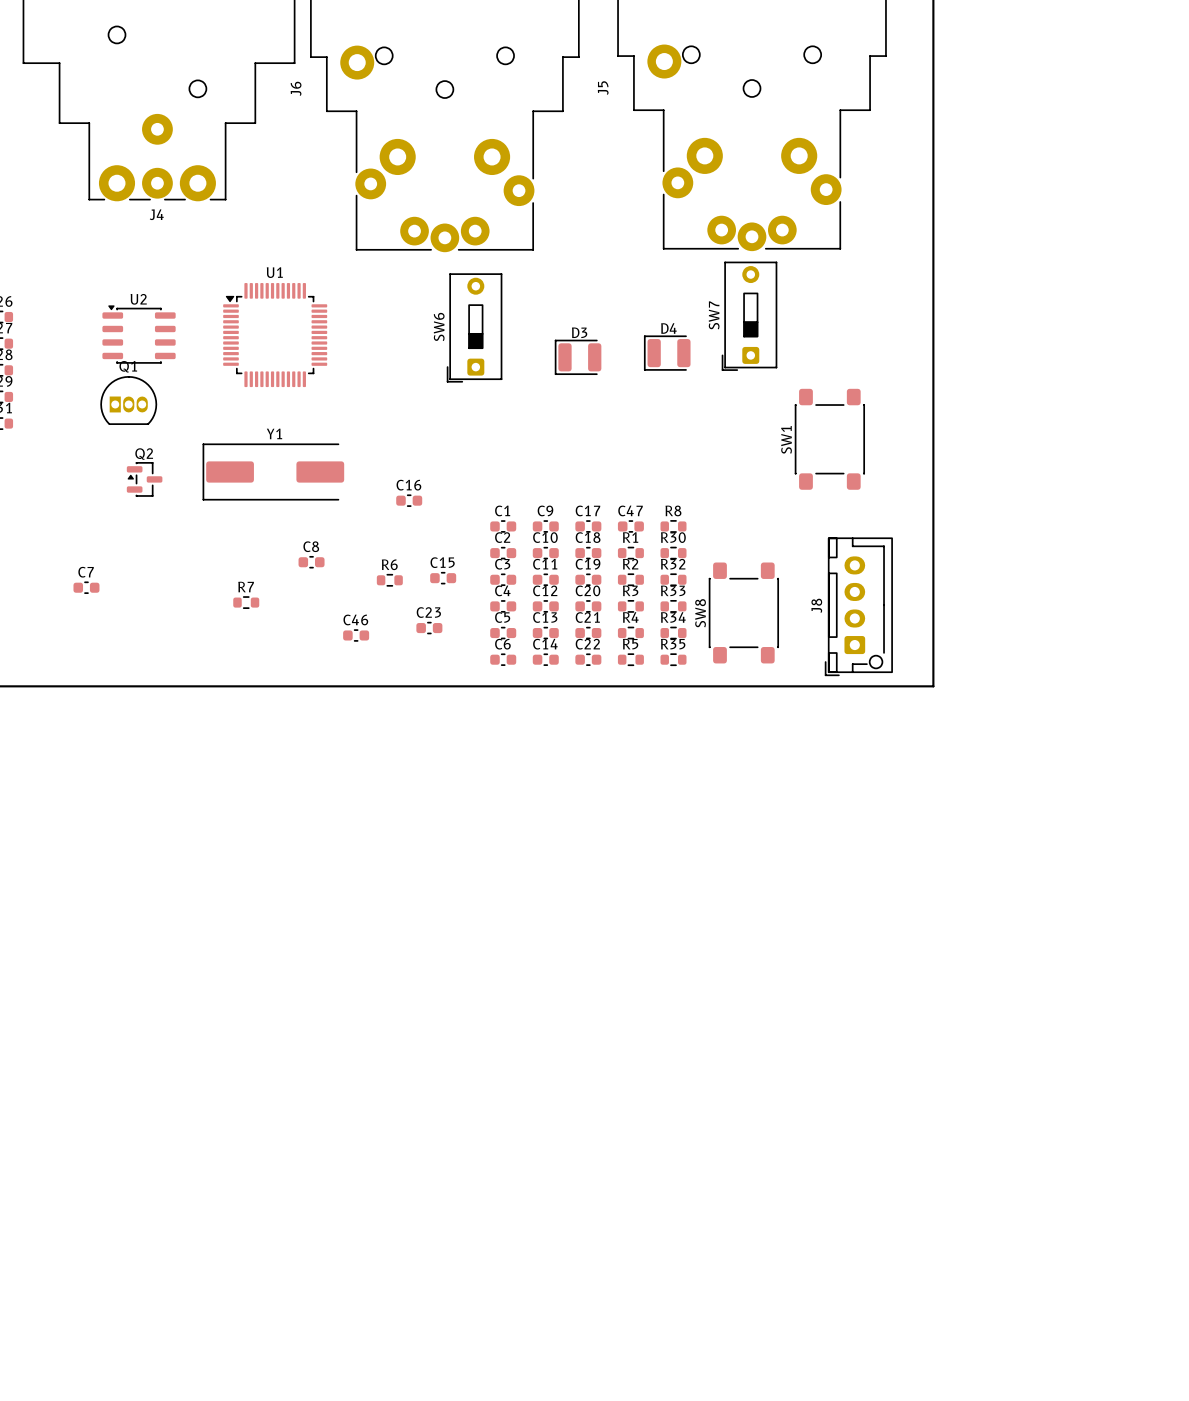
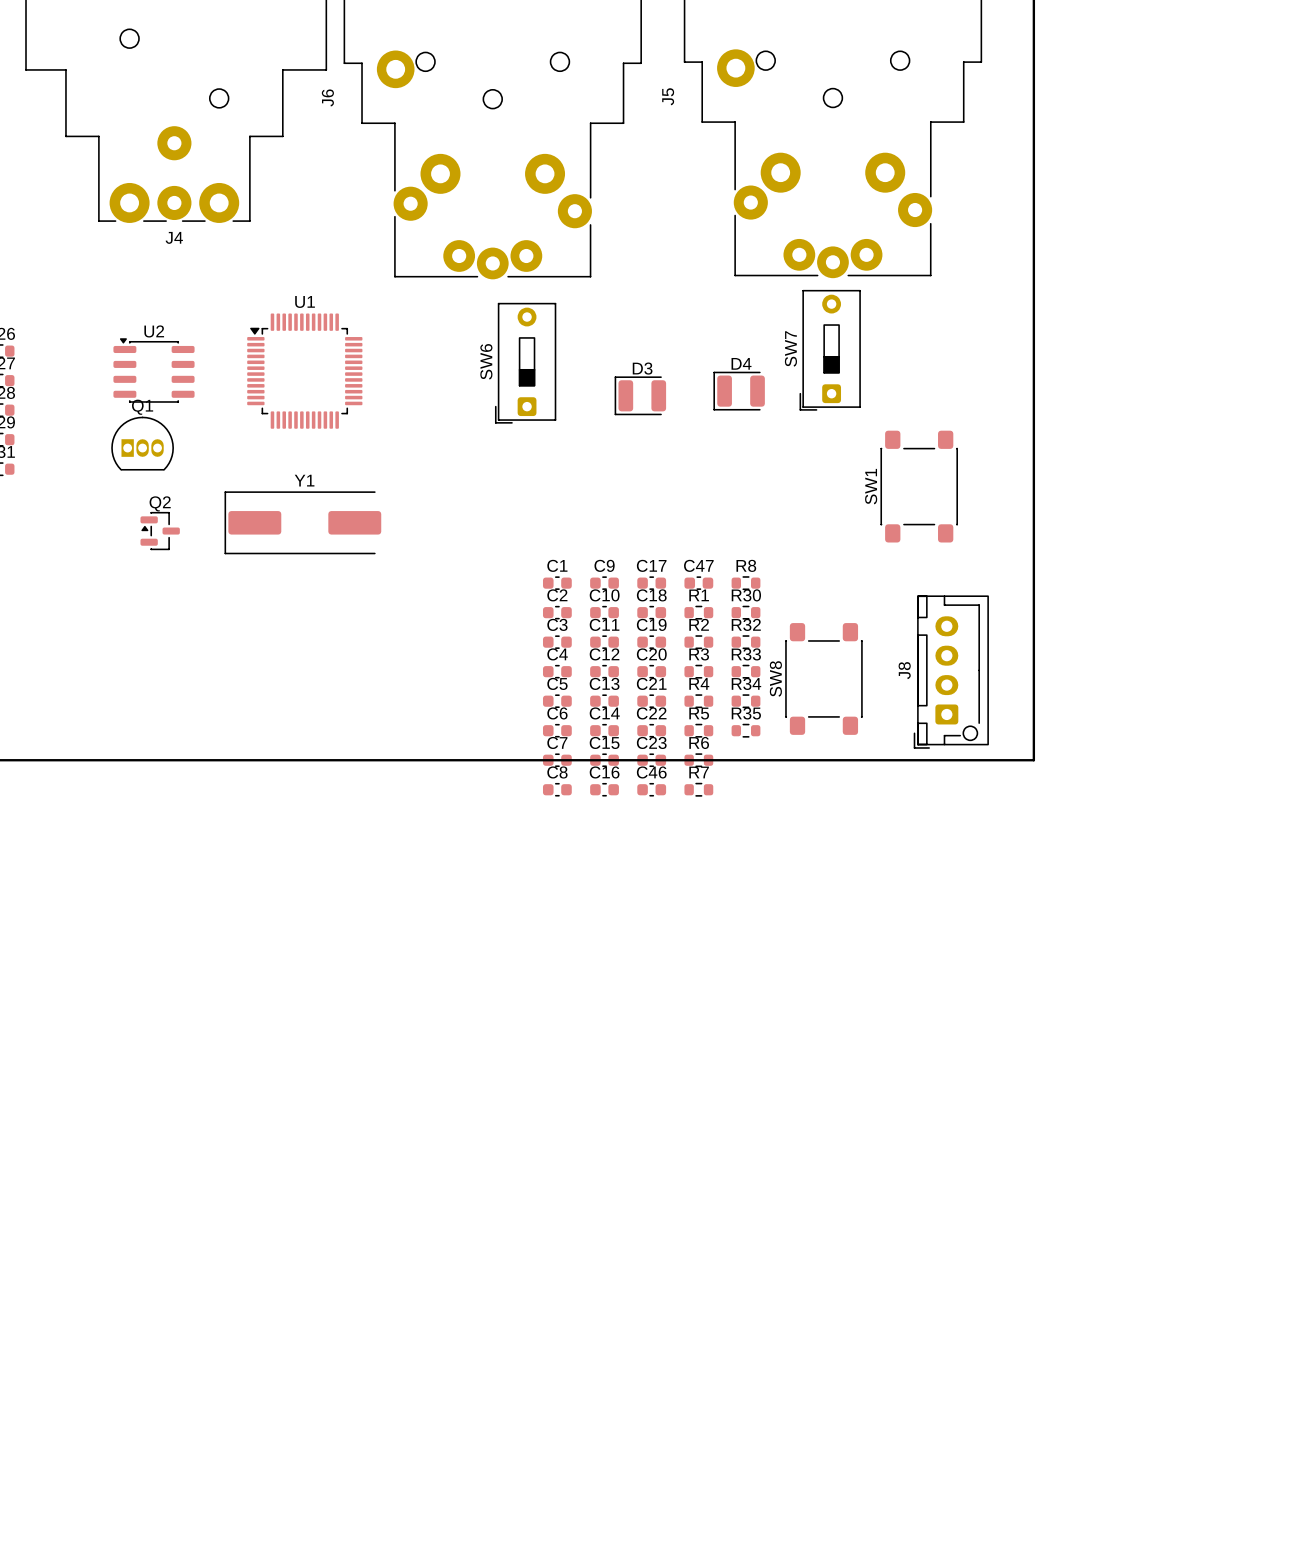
C16 position: (409, 500) -> (604, 789)
C8 position: (311, 562) -> (557, 789)
C15 position: (443, 578) -> (604, 760)
R6 position: (389, 580) -> (698, 760)
C7 position: (86, 587) -> (557, 760)
R7 position: (246, 602) -> (698, 789)
C23 position: (429, 628) -> (651, 760)
C46 position: (356, 635) -> (651, 789)

